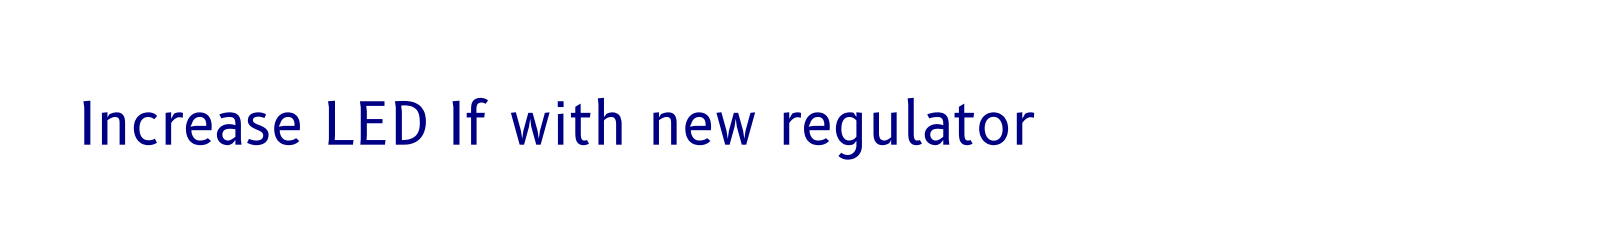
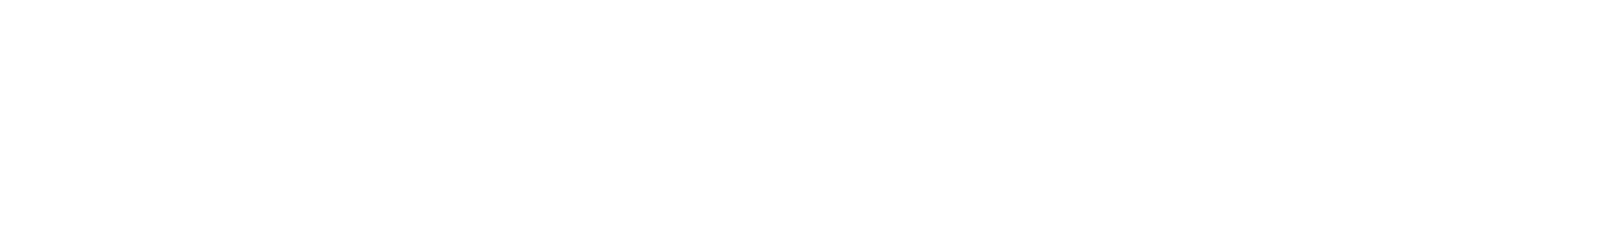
text: Increase LED If with new regulator (558, 128) -> none

